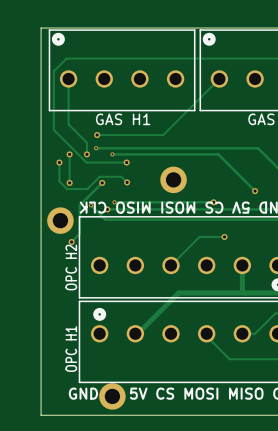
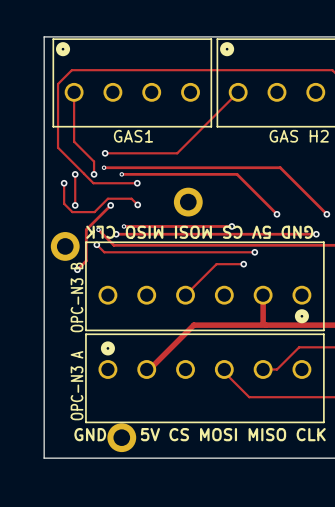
GAS H1 name: GAS H1 (123, 119) -> GAS1 (133, 136)
track: none -> (96, 244) (104, 252) (254, 252)
via: none -> (96, 244)
via: none -> (254, 252)
part value: OPC H2 (71, 267) -> OPC-N3 B (77, 297)
part value: OPC H1 (71, 349) -> OPC-N3 A (77, 385)

